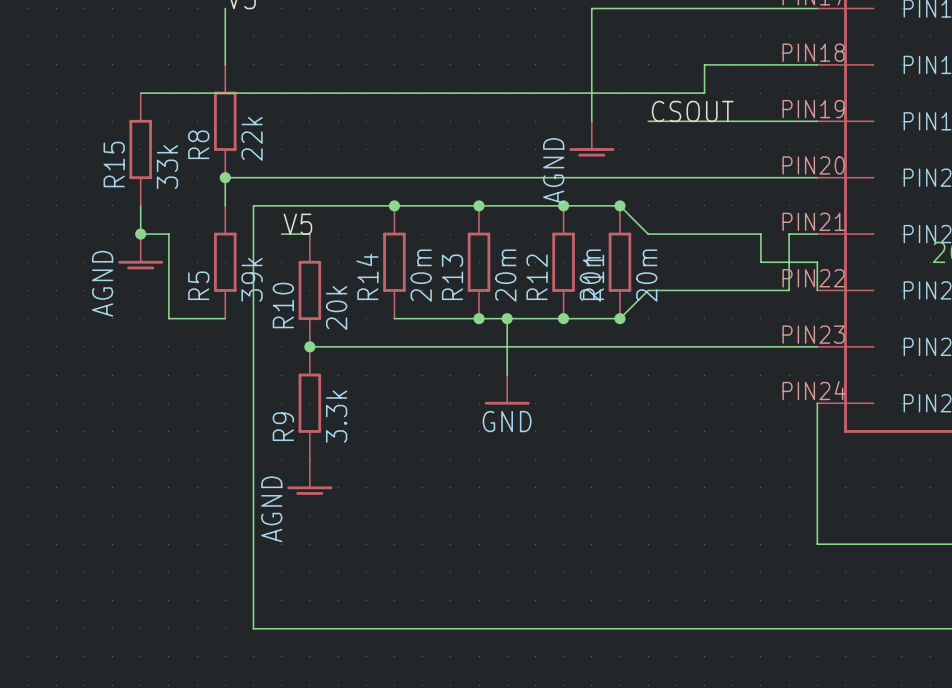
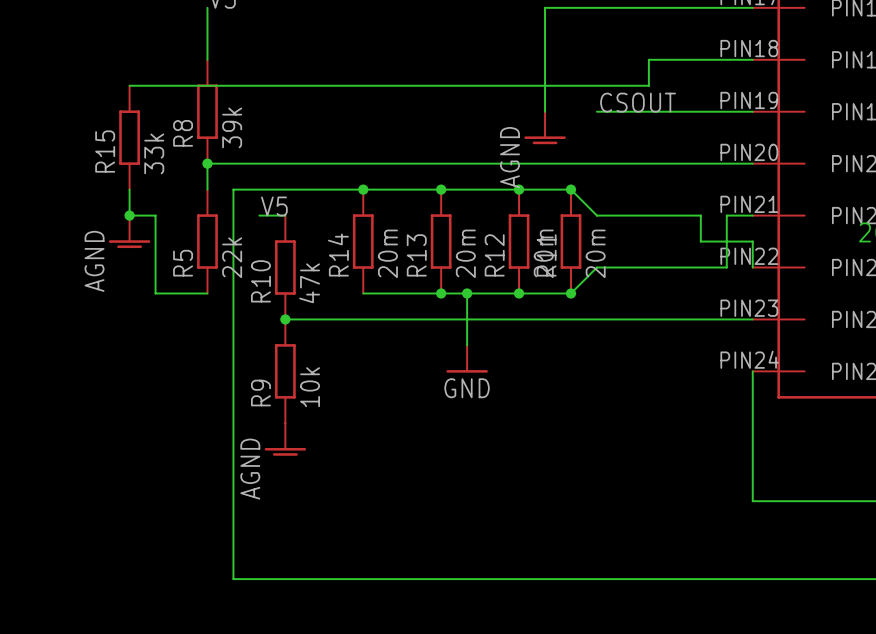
R8 value: 22k (252, 138) -> 39k (232, 127)
R5 value: 39k (252, 279) -> 22k (232, 257)
R10 value: 20k (336, 308) -> 47k (309, 283)
R9 value: 3.3k (336, 416) -> 10k (310, 387)

